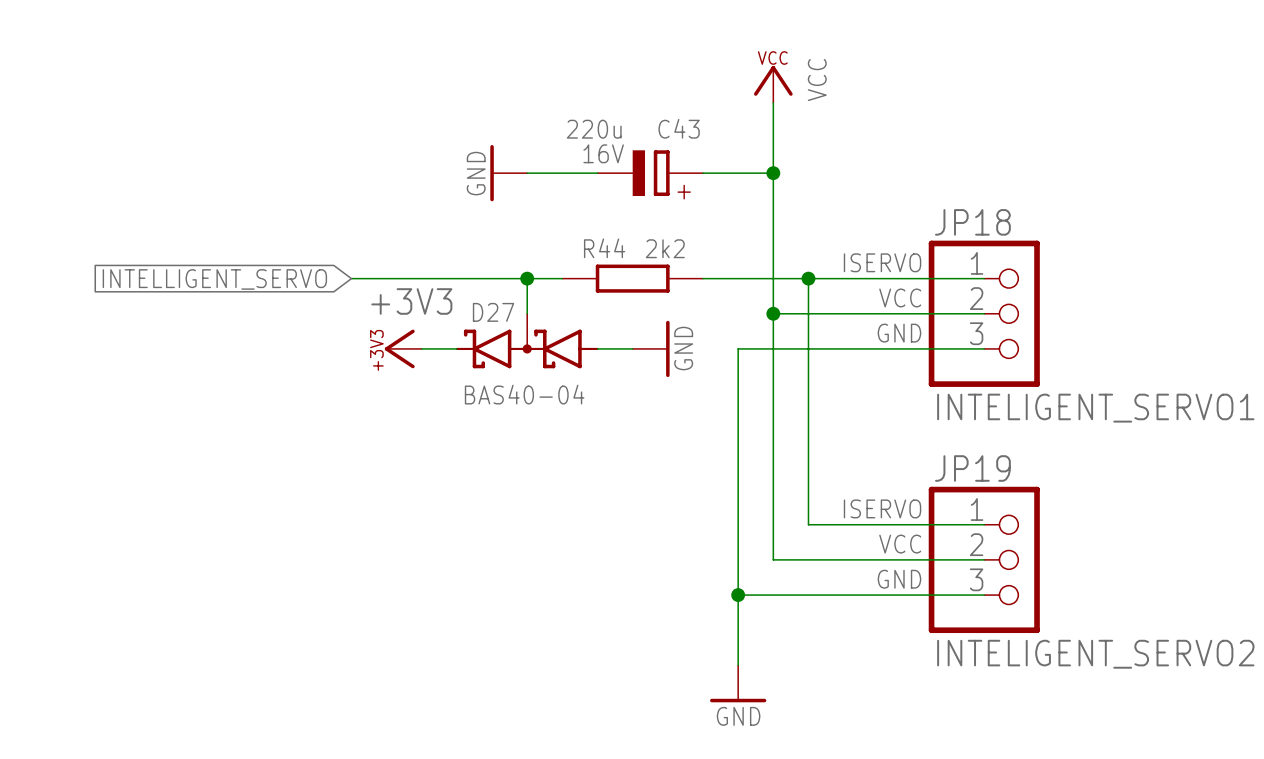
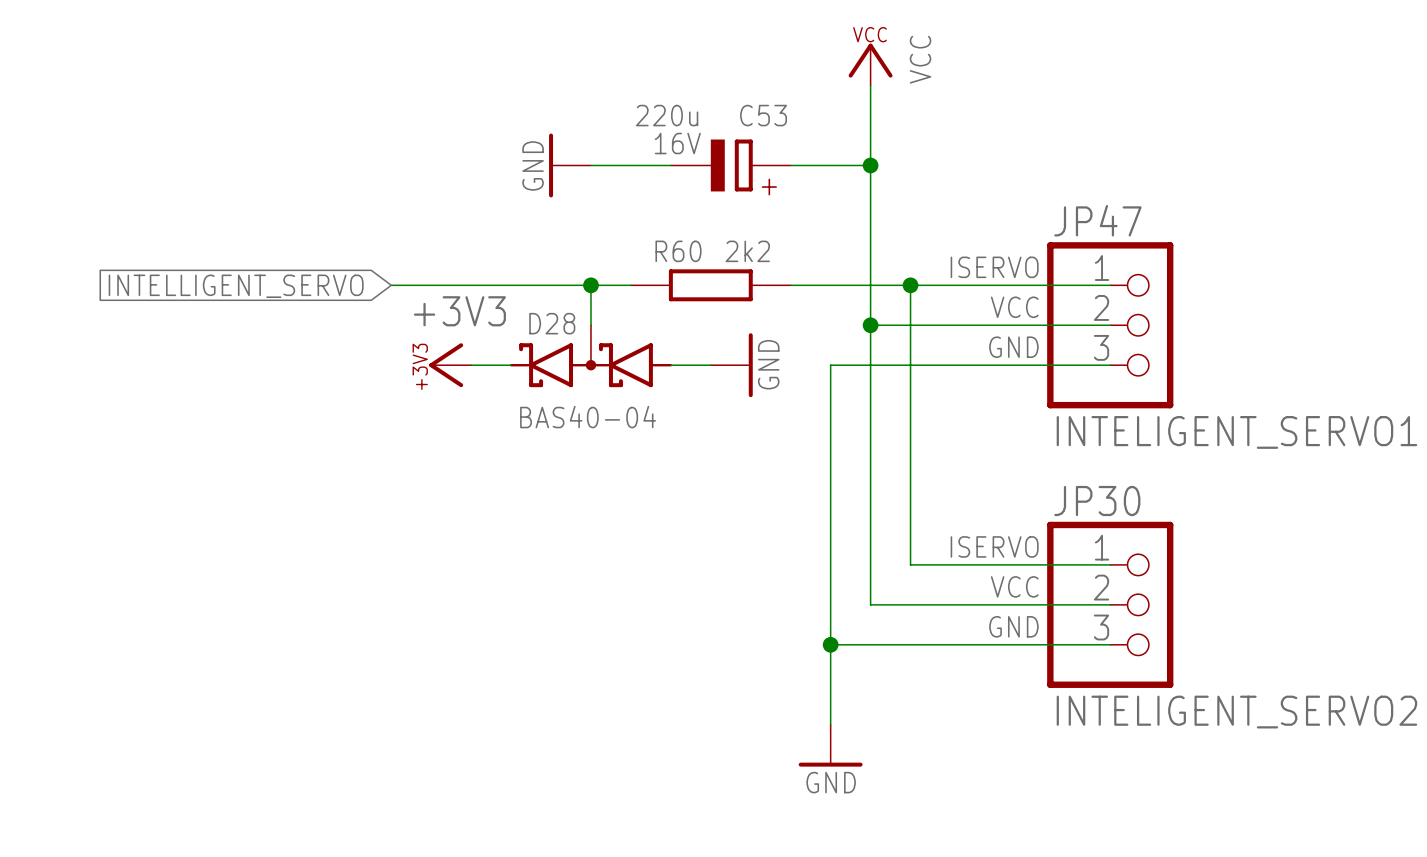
C43 name: C43 (679, 128) -> C53 (763, 115)
JP18 name: JP18 (972, 222) -> JP47 (1097, 220)
R44 name: R44 (604, 248) -> R60 (678, 251)
D27 name: D27 (493, 312) -> D28 (552, 323)
JP19 name: JP19 (972, 468) -> JP30 (1097, 501)

